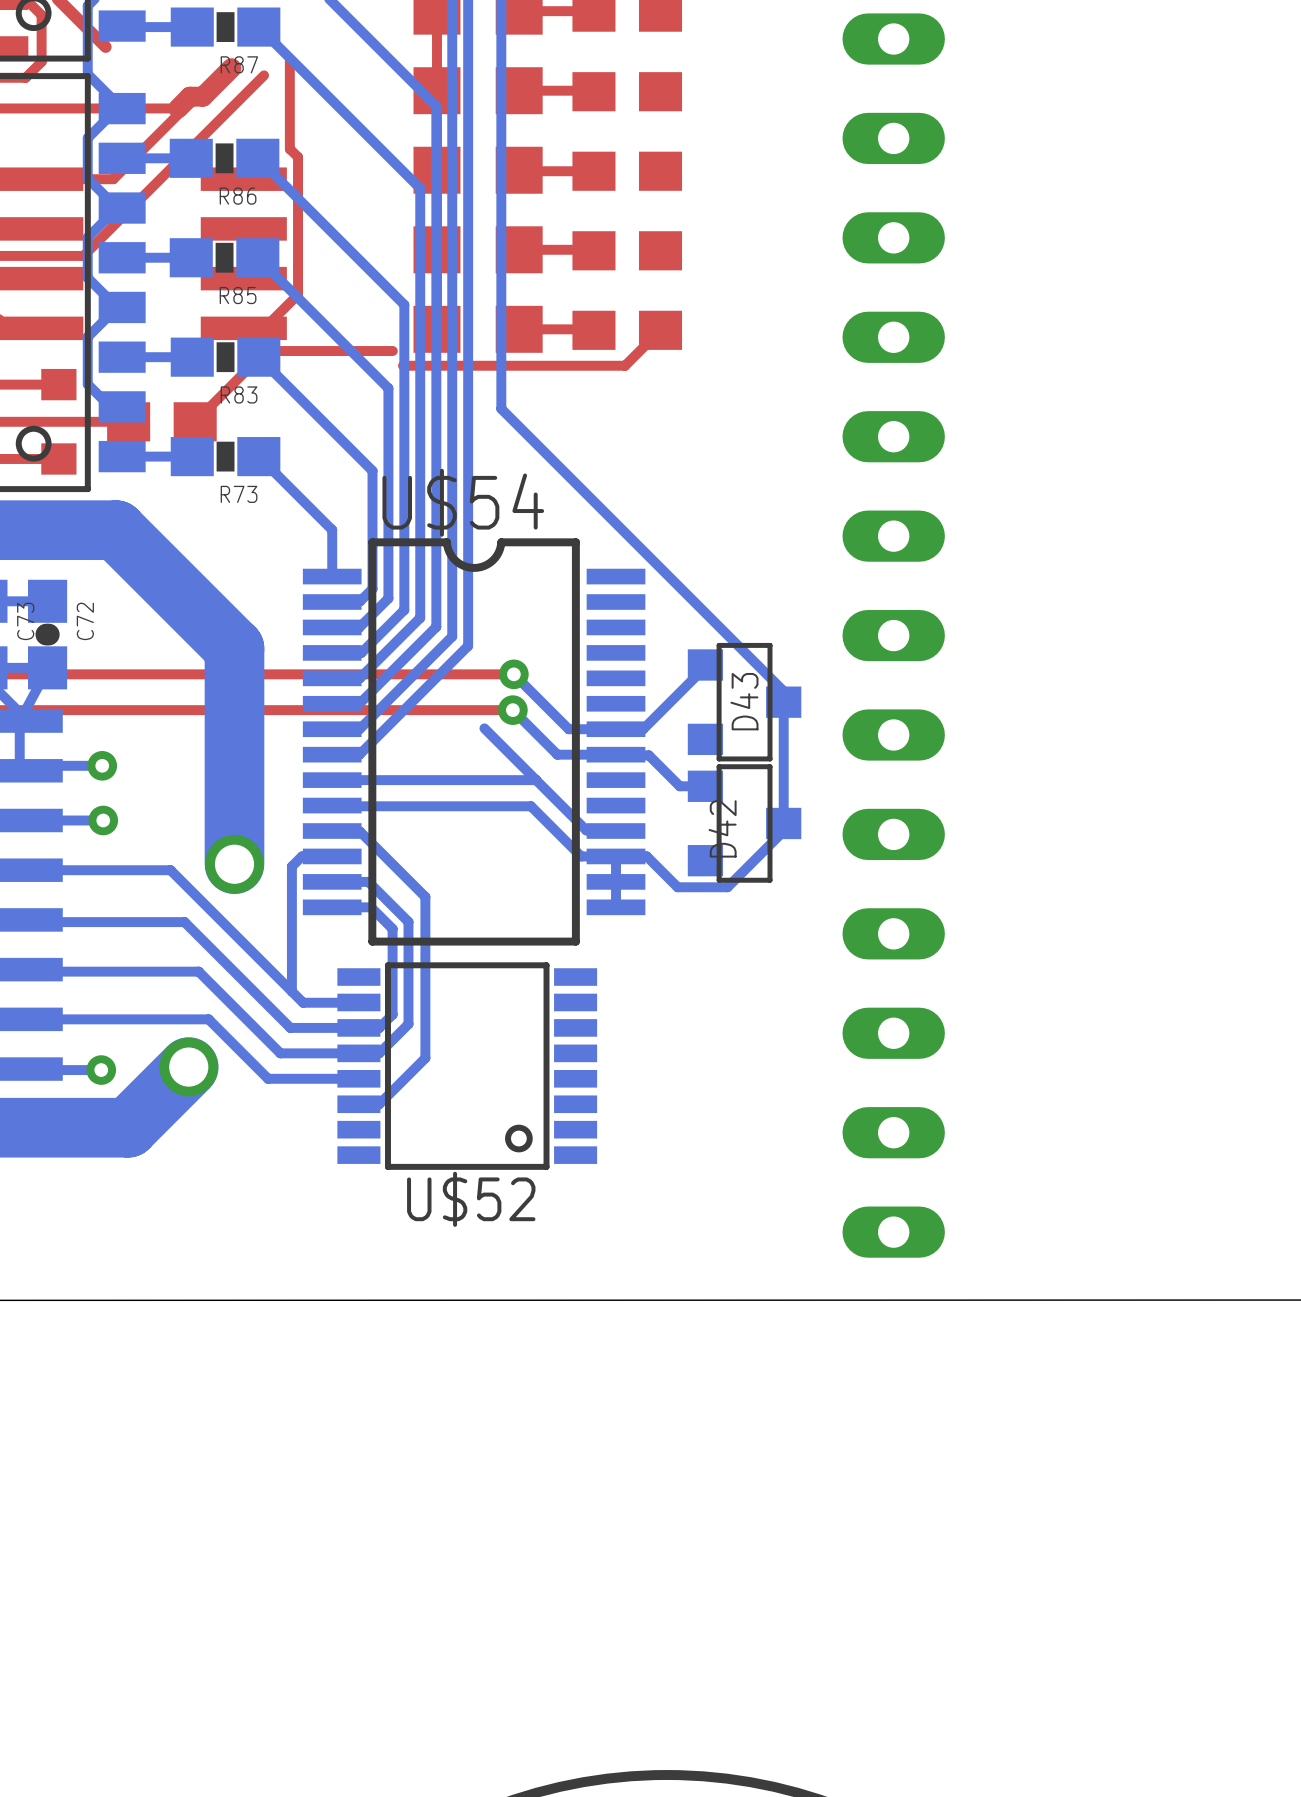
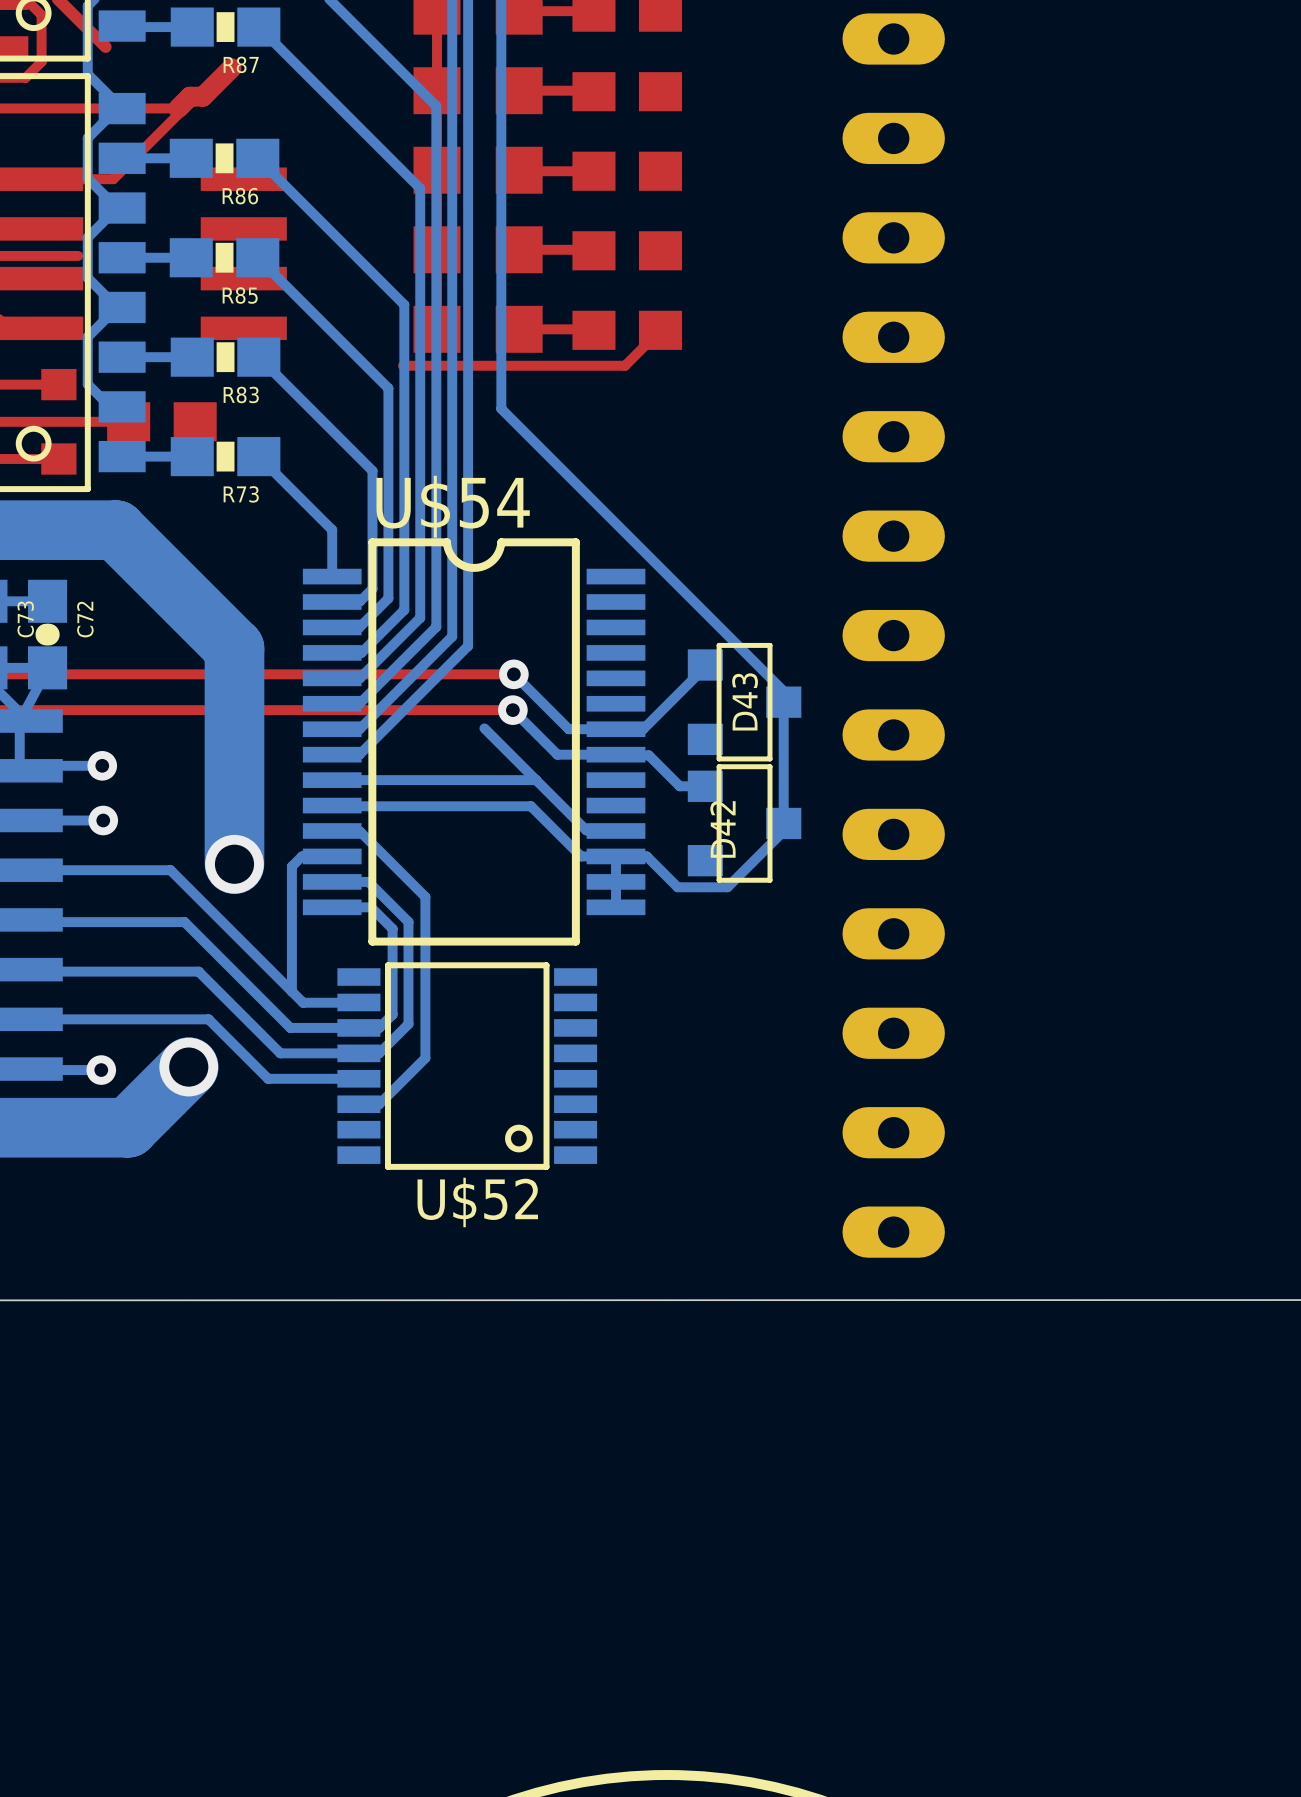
top track: (289, 61) (289, 148) (298, 157) (298, 294) (264, 328) -> none
top track: (264, 75) (83, 255) (78, 255) -> none
top track: (392, 351) (265, 351) (195, 421) -> none

